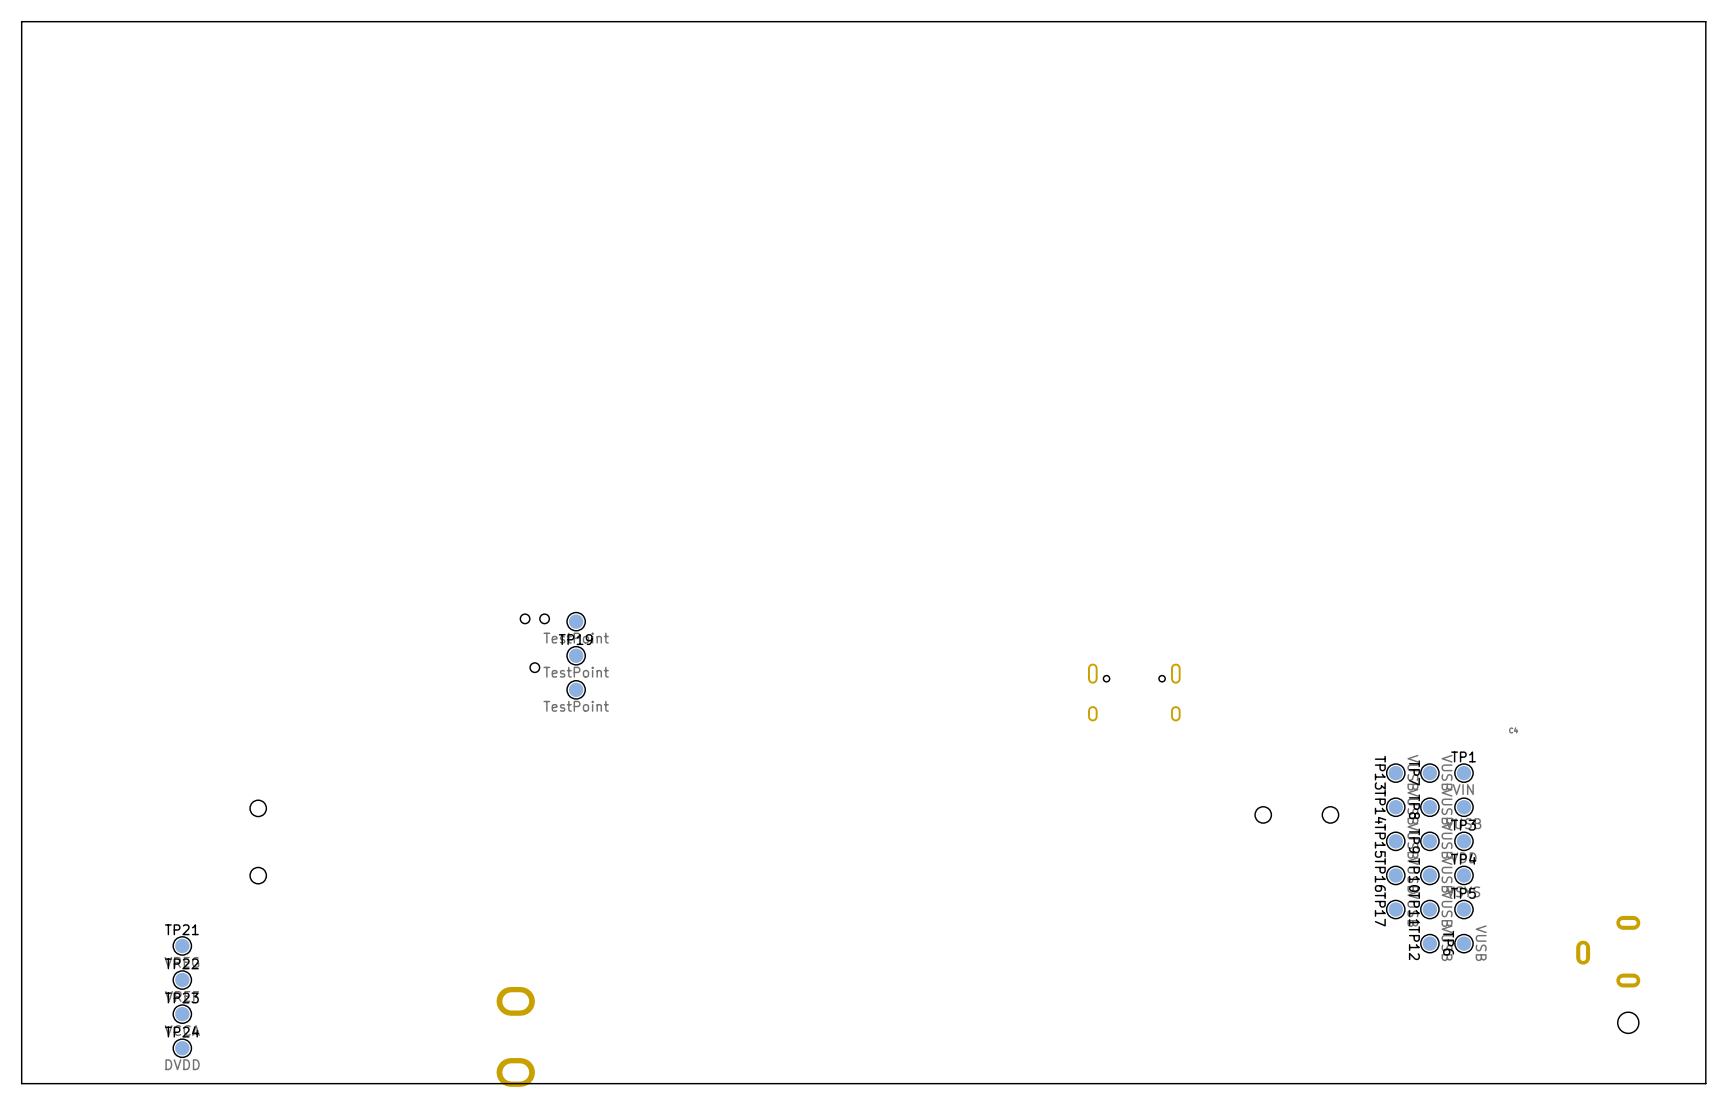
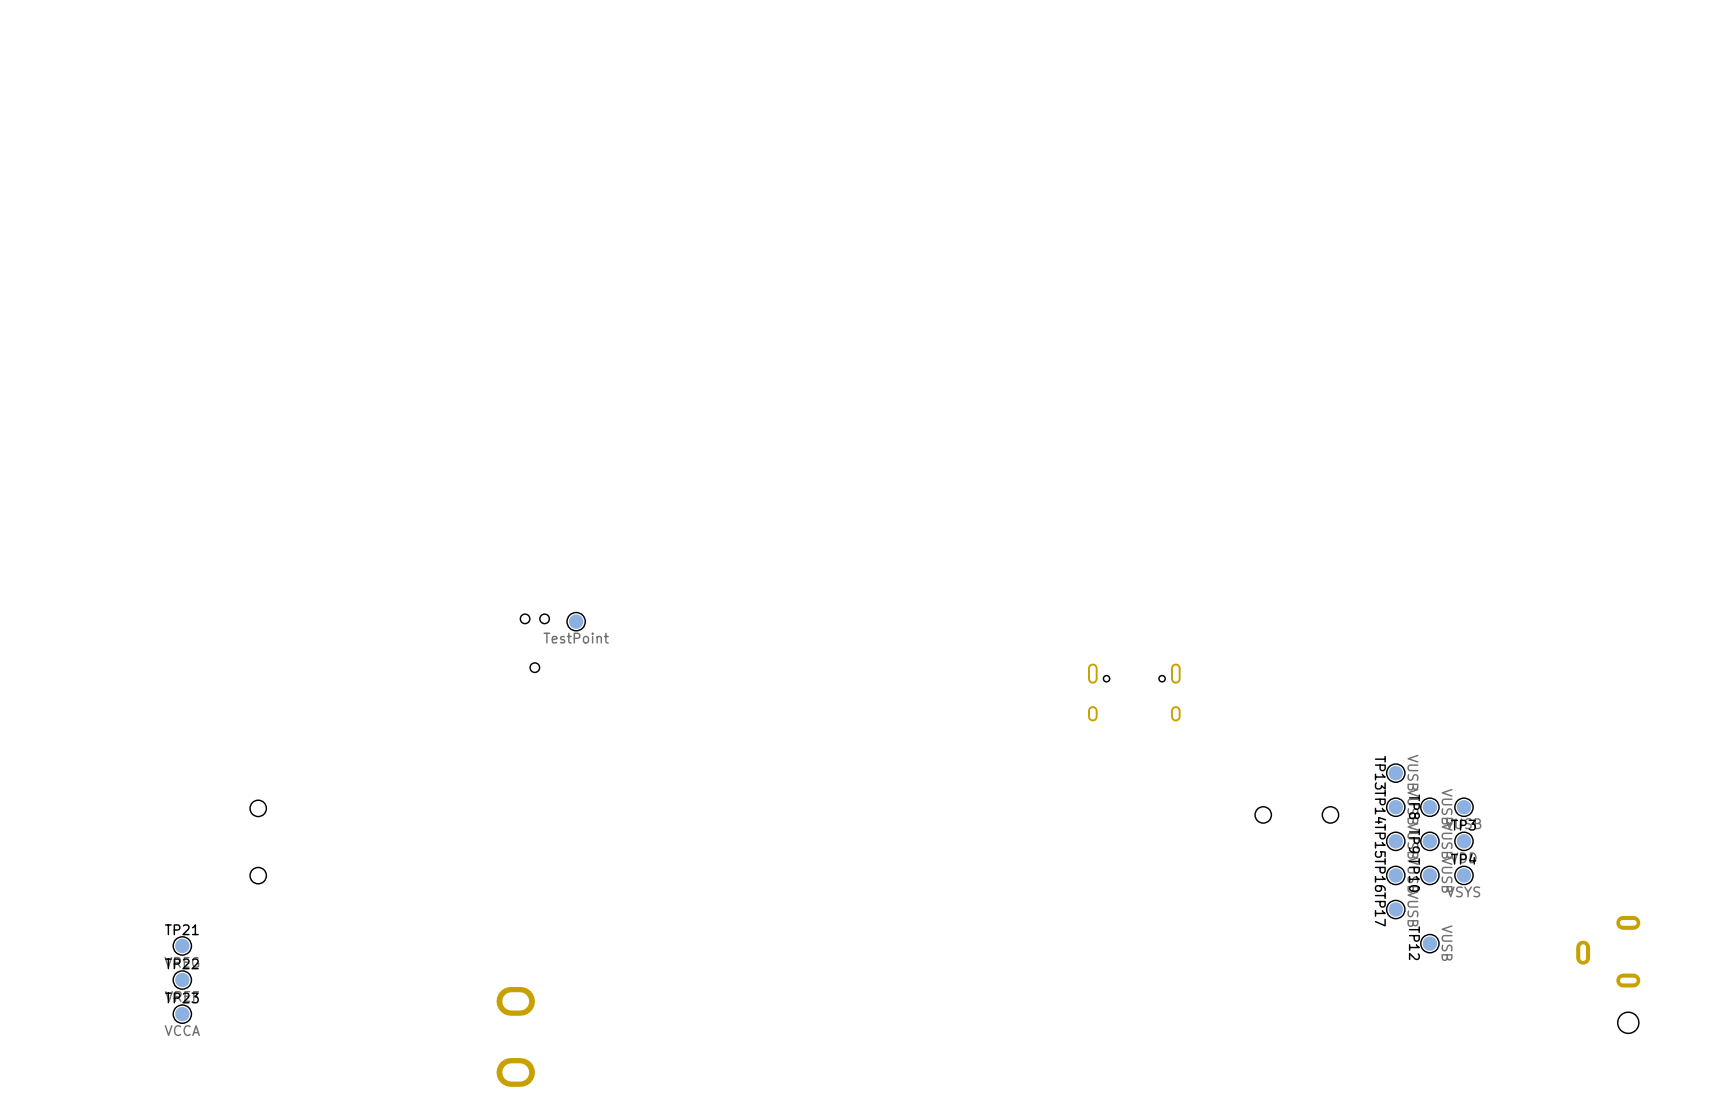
board edge: (1705, 21) (21, 21) (21, 1083) (1705, 1083) (1705, 21) -> none
TP19: TestPoint (576, 655) -> none
part: TestPoint (576, 689) -> none
part: (1513, 730) -> none
TP7: VUSB (1429, 773) -> none
TP1: VIN (1463, 773) -> none
TP11: VUSB (1429, 909) -> none
TP5: (1463, 909) -> none
TP6: VUSB (1463, 943) -> none
TP24: DVDD (182, 1048) -> none

